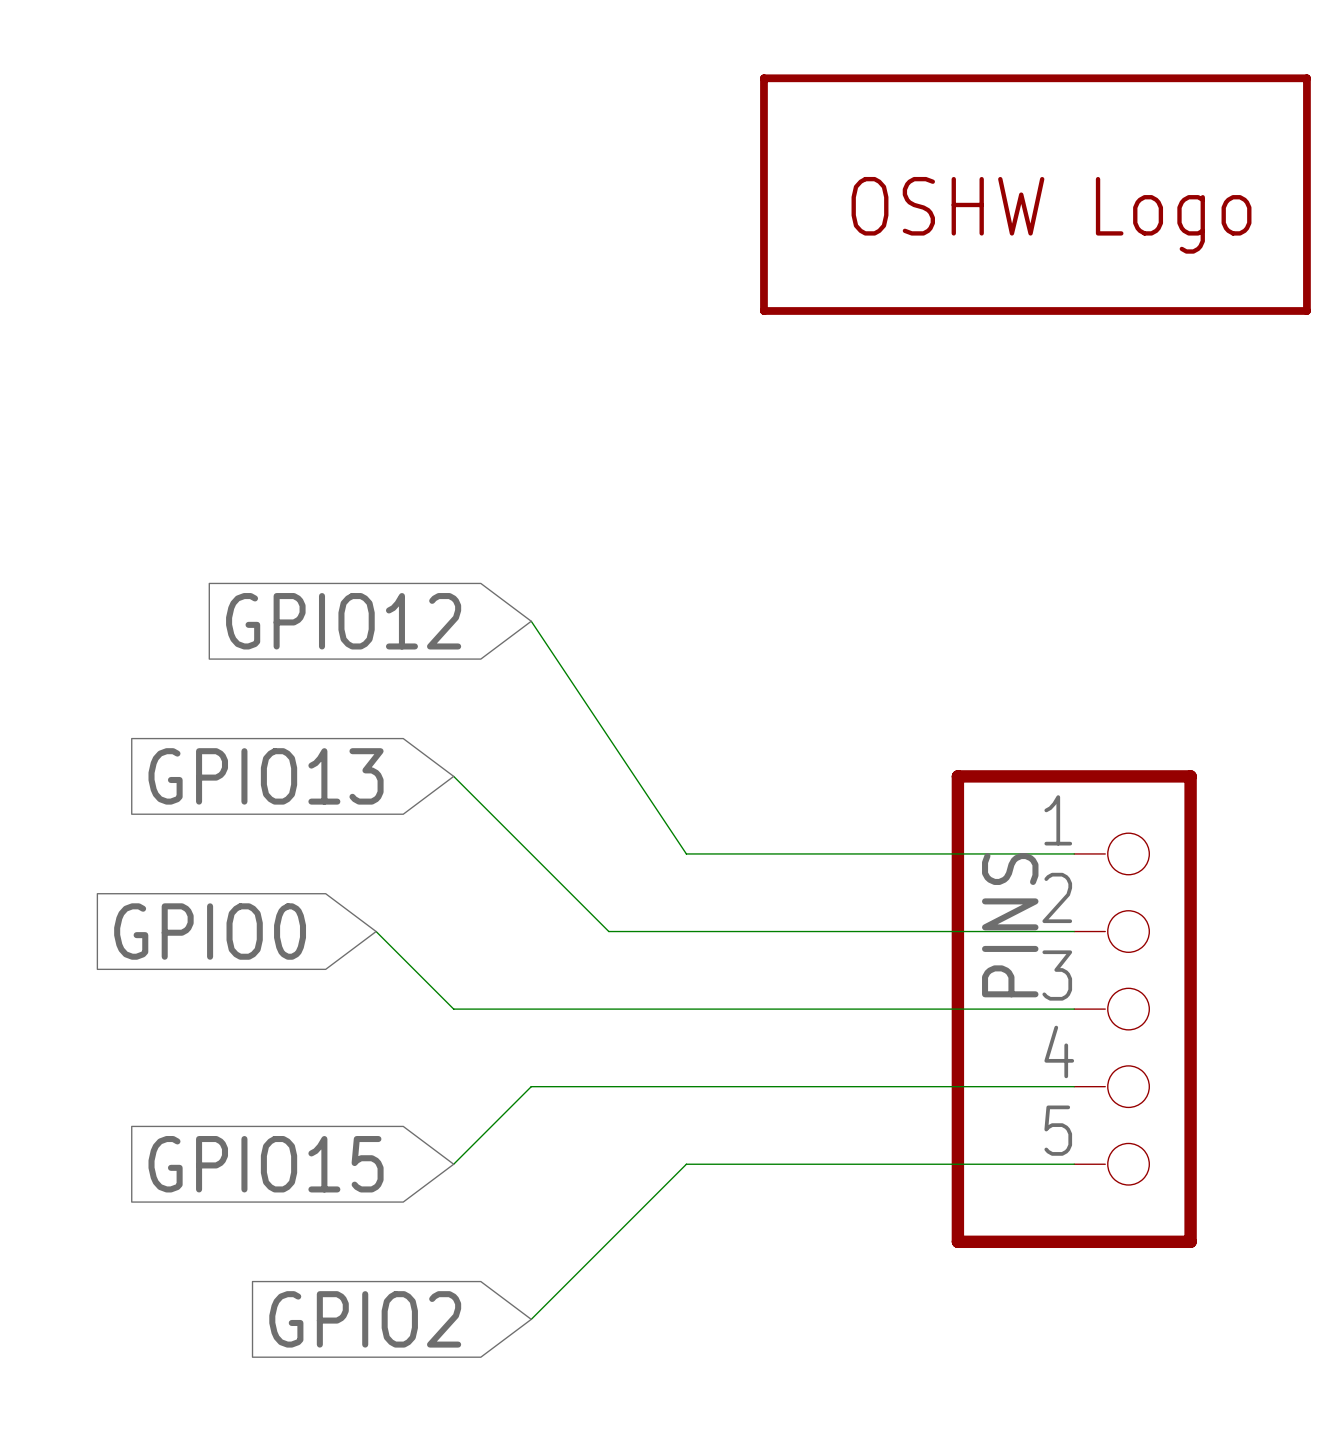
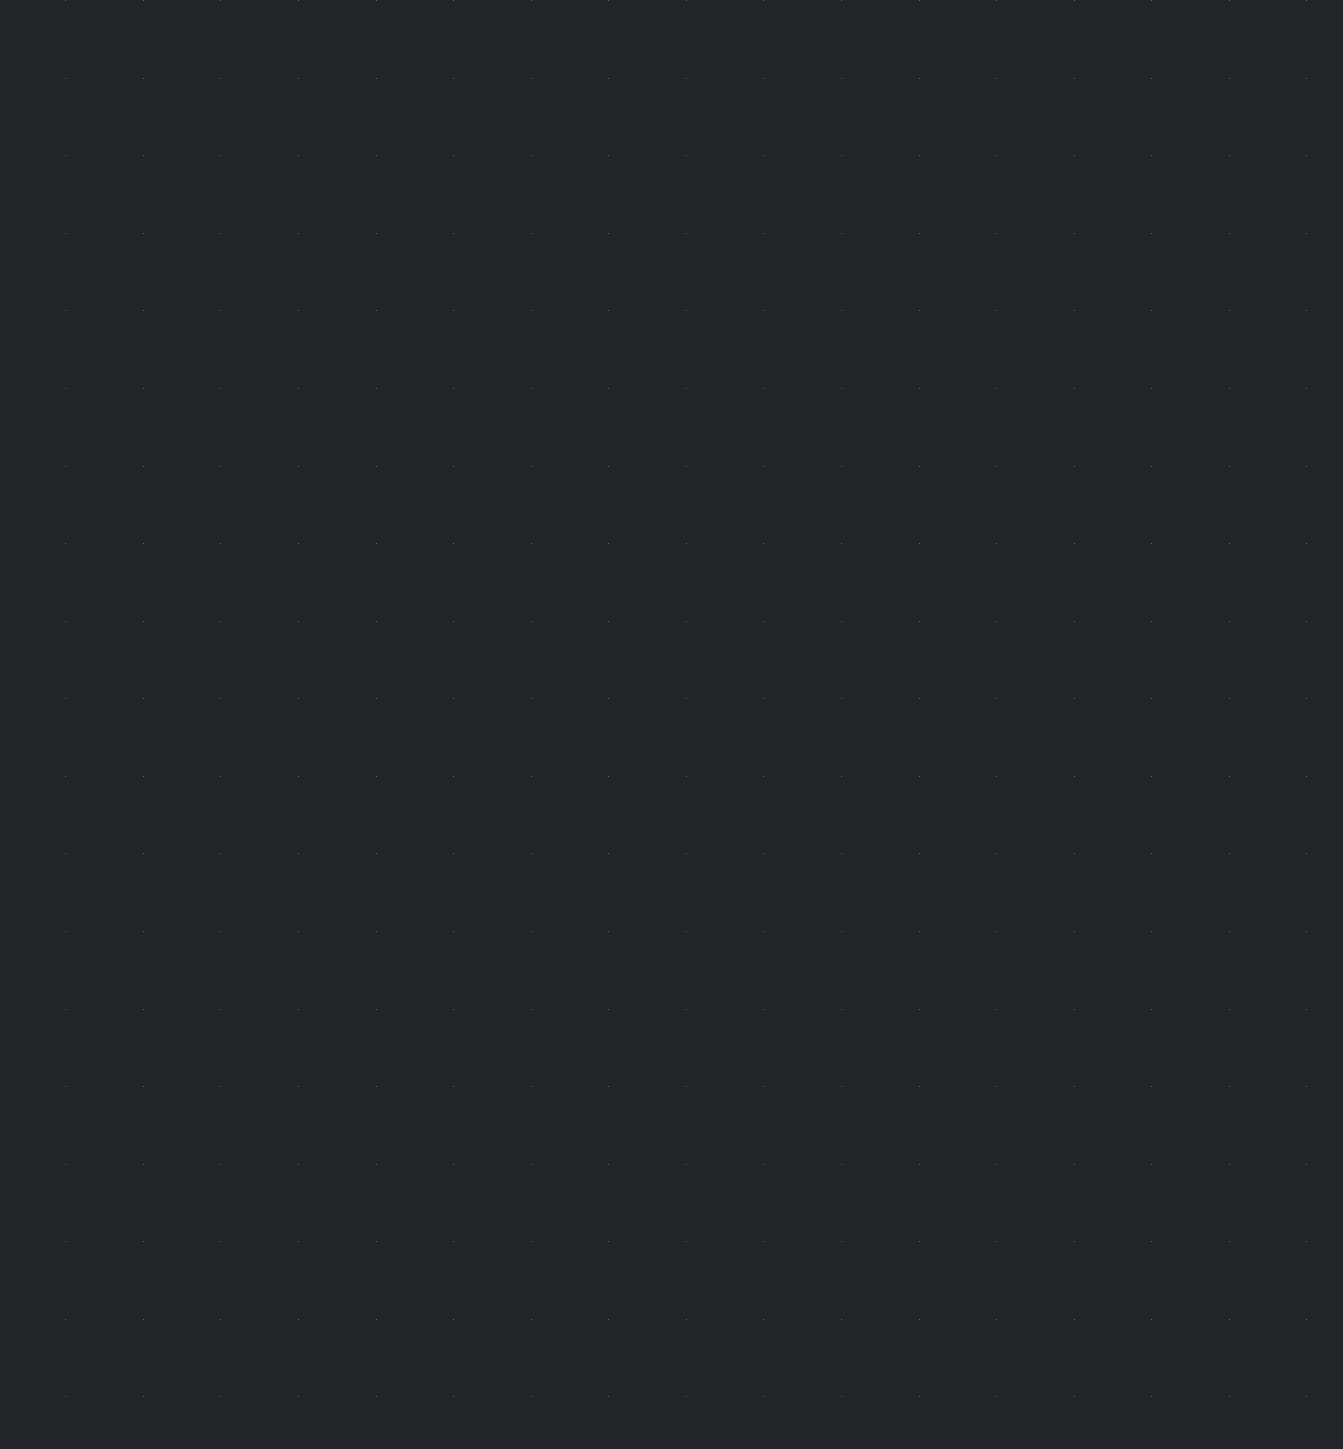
part: (1035, 194) -> none
global label: GPIO12 (343, 621) -> none
wire: (531, 621) (686, 853) (1074, 853) -> none
global label: GPIO13 (266, 776) -> none
wire: (453, 776) (608, 931) (1074, 931) -> none
global label: GPIO0 (210, 931) -> none
wire: (376, 931) (453, 1009) (1074, 1009) -> none
PINS: (1074, 1009) -> none
wire: (1074, 1086) (531, 1086) (453, 1164) -> none
global label: GPIO15 (266, 1164) -> none
wire: (1074, 1164) (686, 1164) (531, 1319) -> none
global label: GPIO2 (365, 1319) -> none

